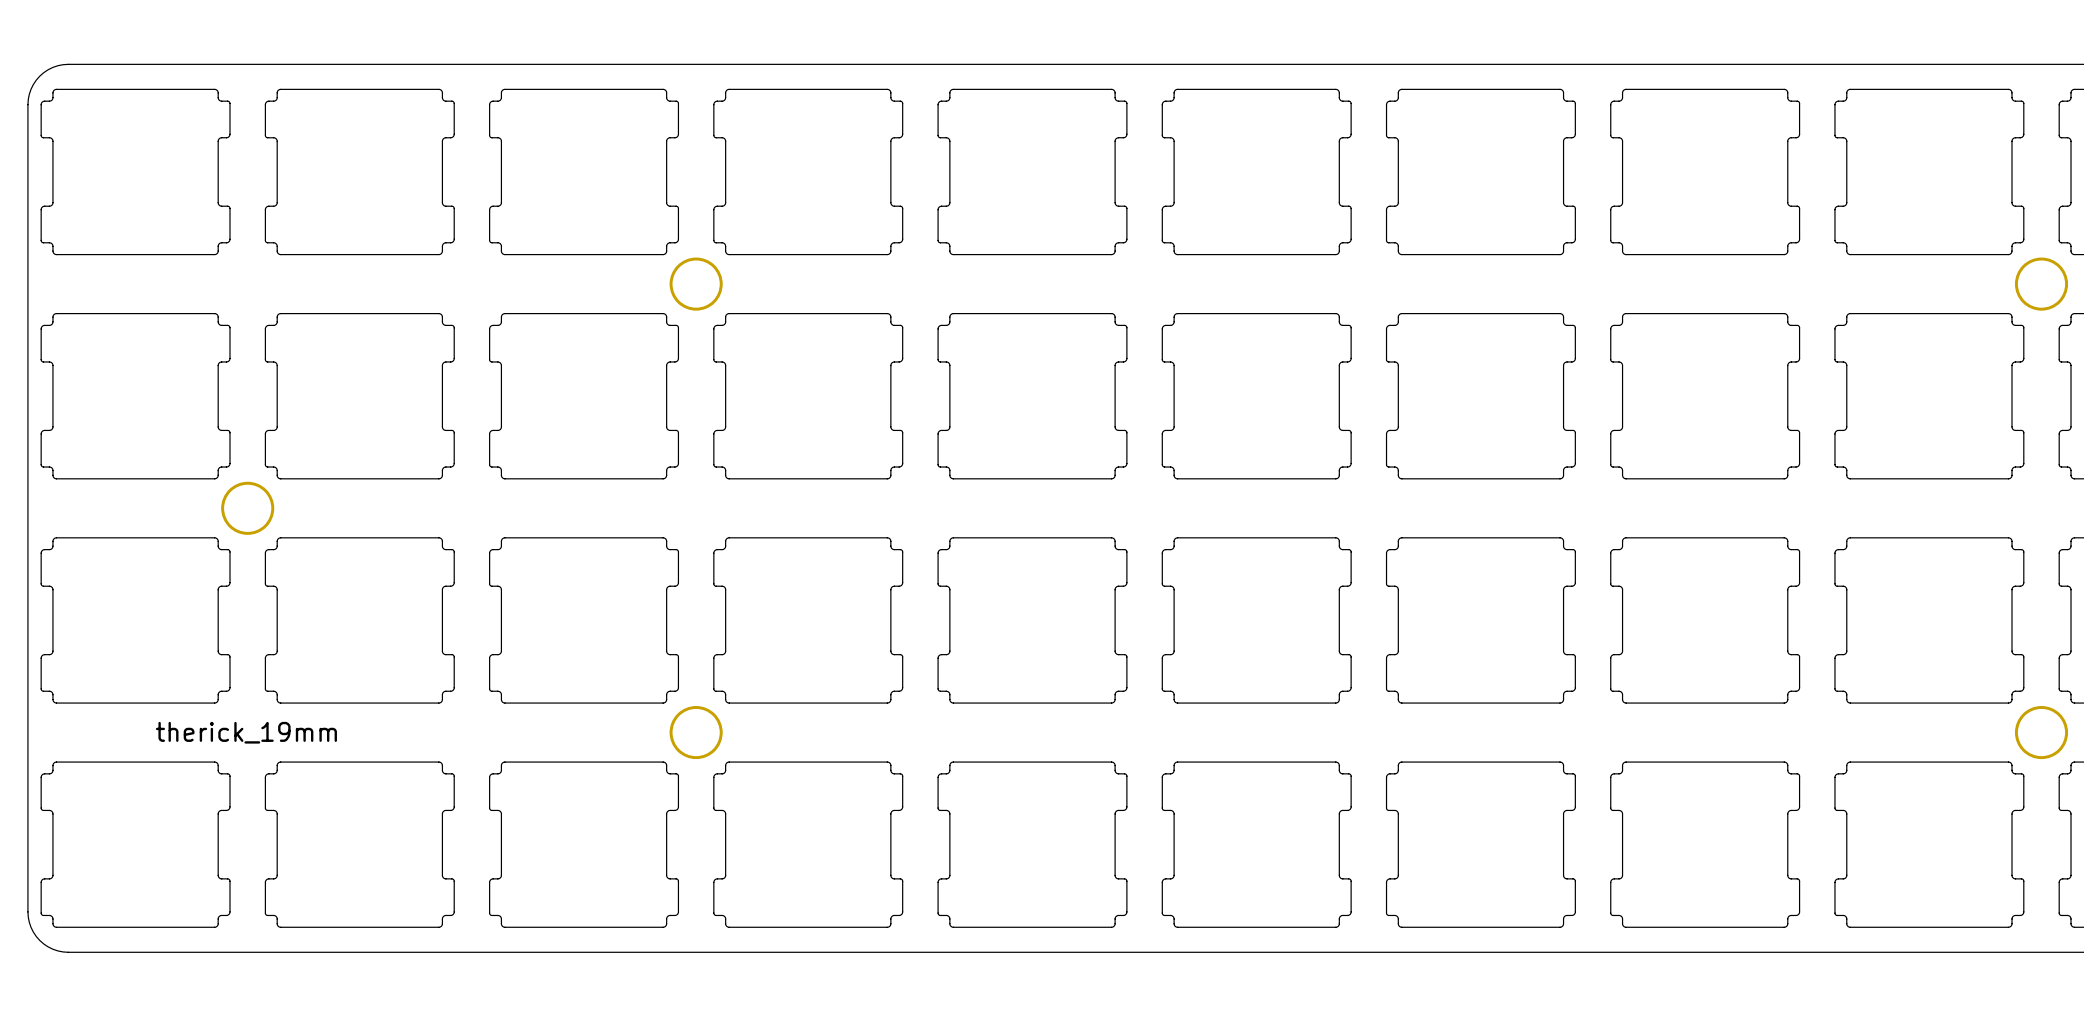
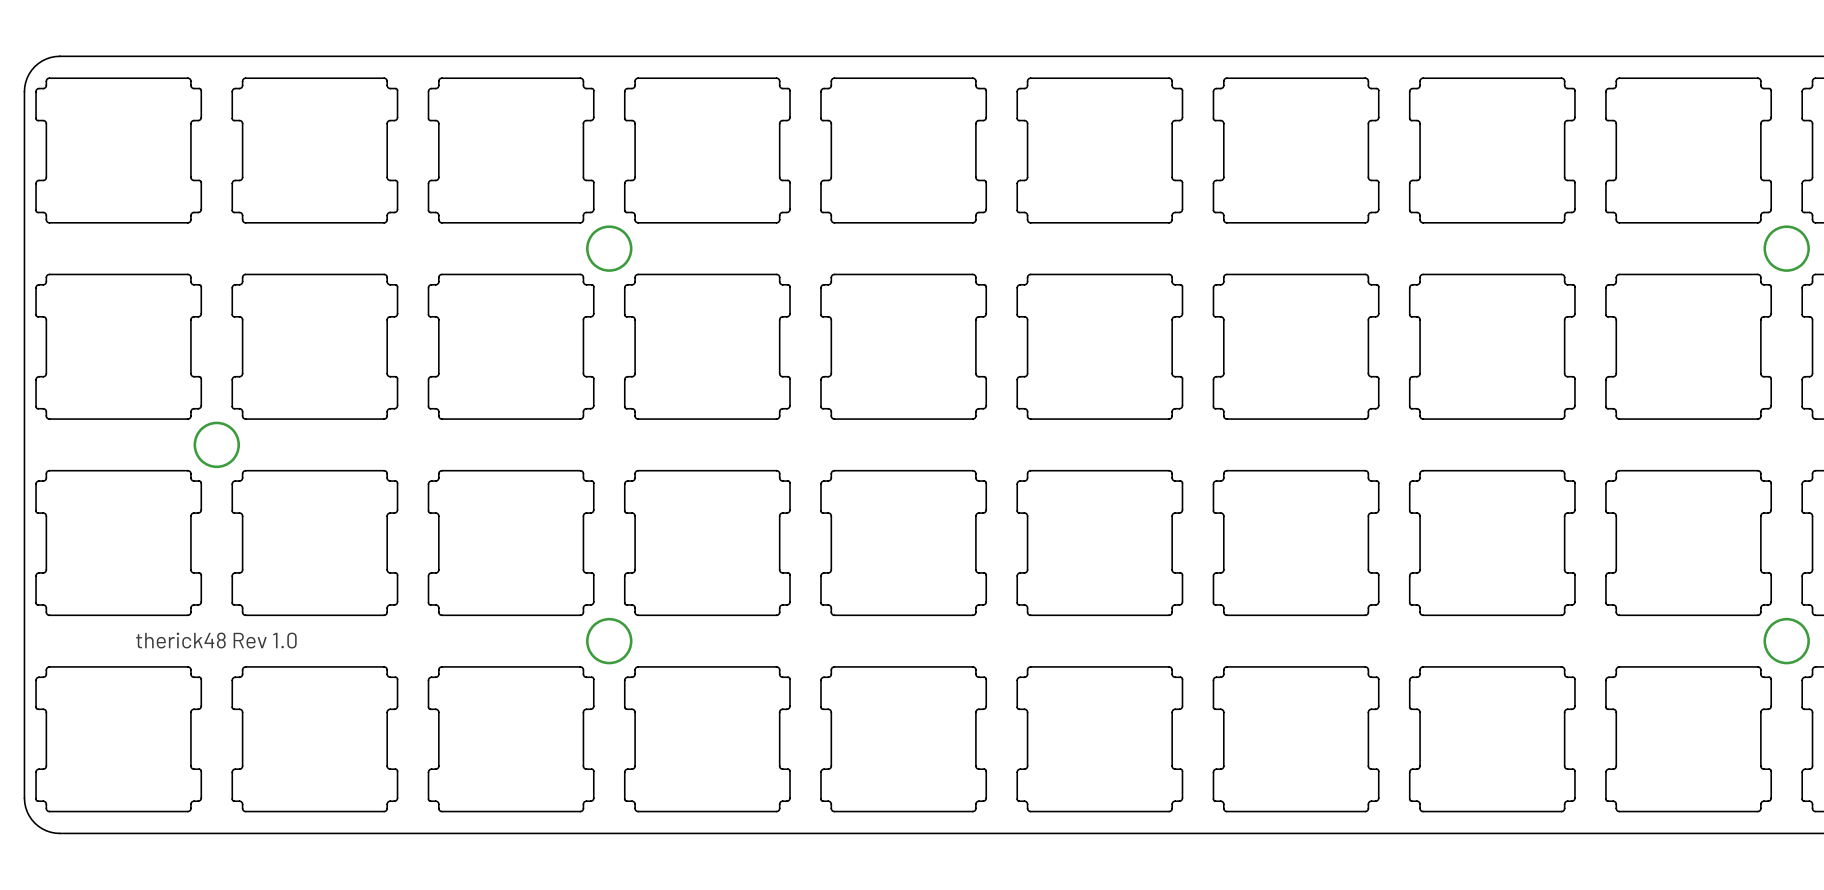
text: therick_19mm (246, 732) -> therick48 Rev 1.0 (216, 640)

